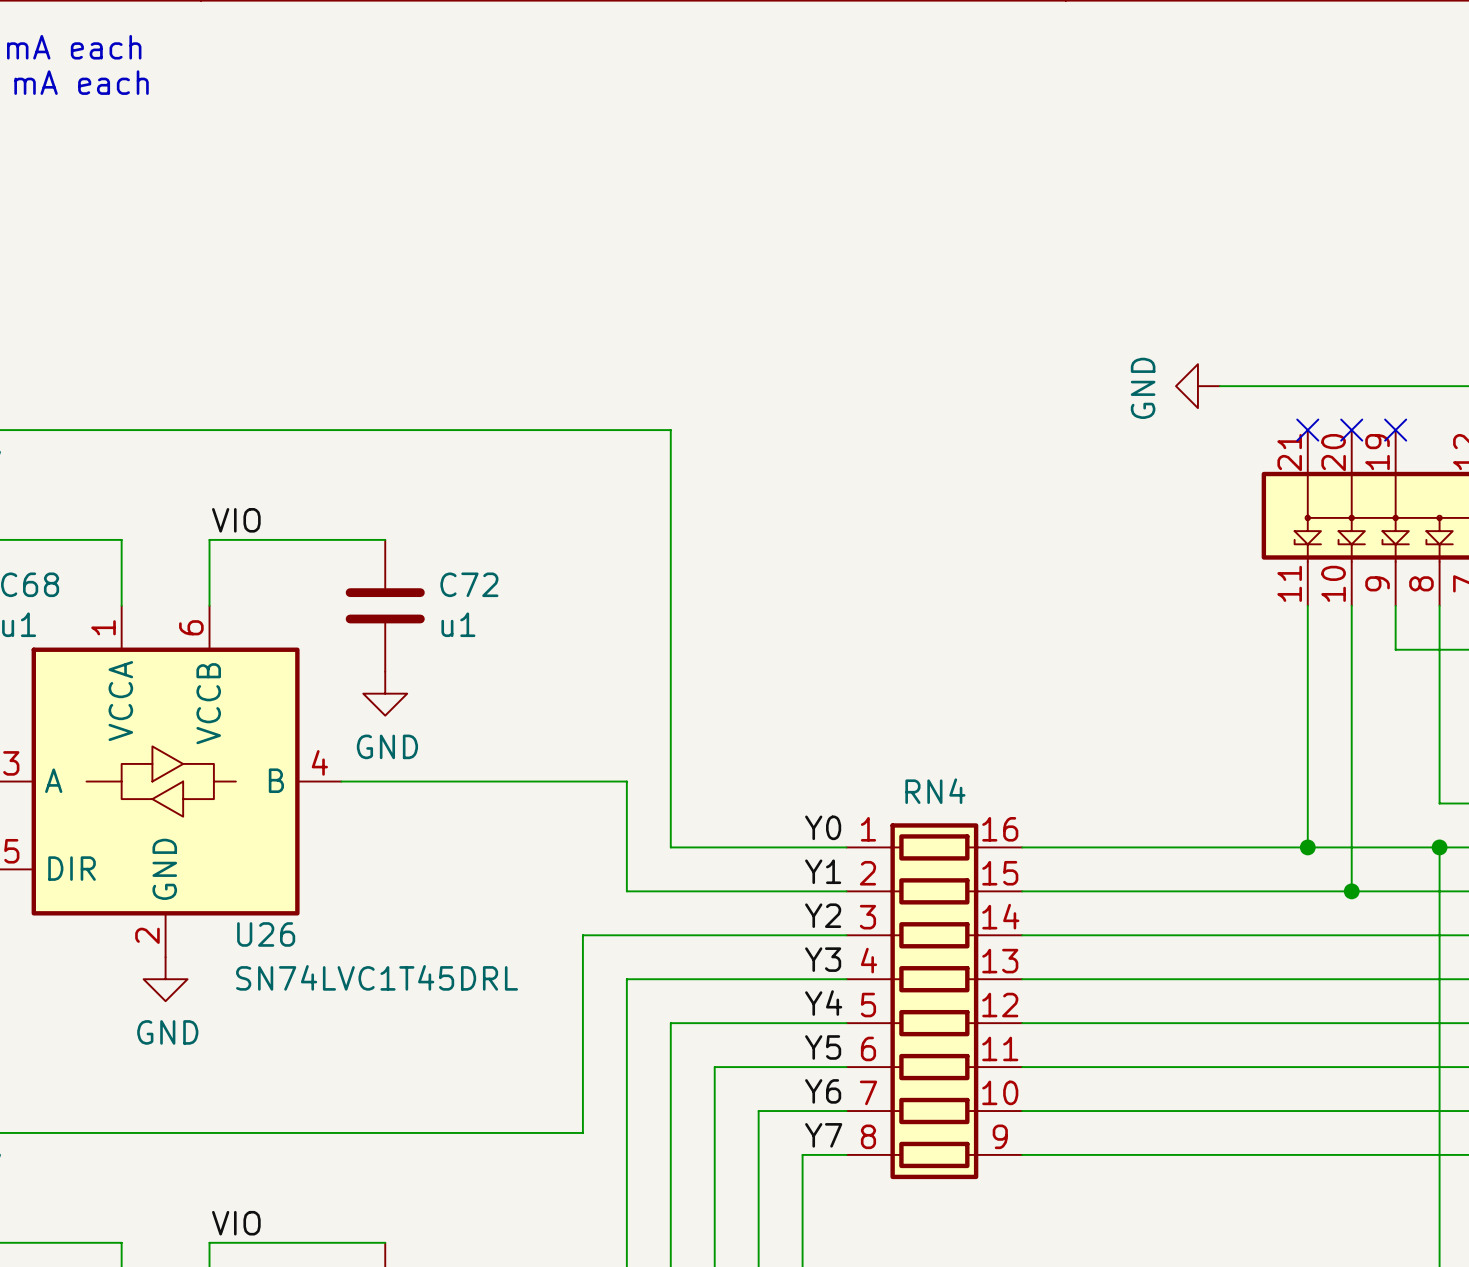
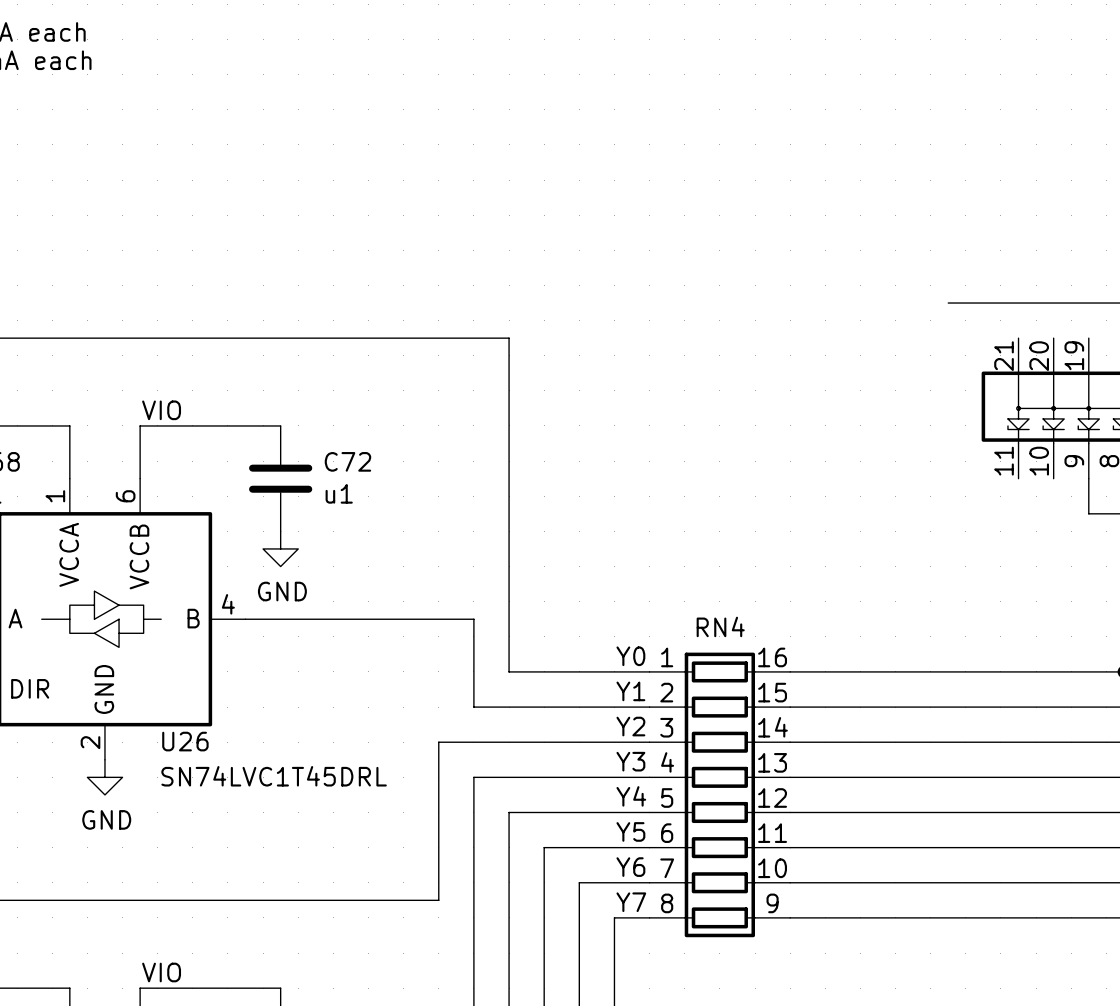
power symbol: GND (1197, 386) -> none
no-connect mark: (1307, 430) -> none
no-connect mark: (1351, 430) -> none
no-connect mark: (1395, 430) -> none
wire: (1307, 605) (1307, 847) -> none
wire: (1351, 605) (1351, 891) -> none
junction: (1307, 847) -> none
junction: (1351, 891) -> none

